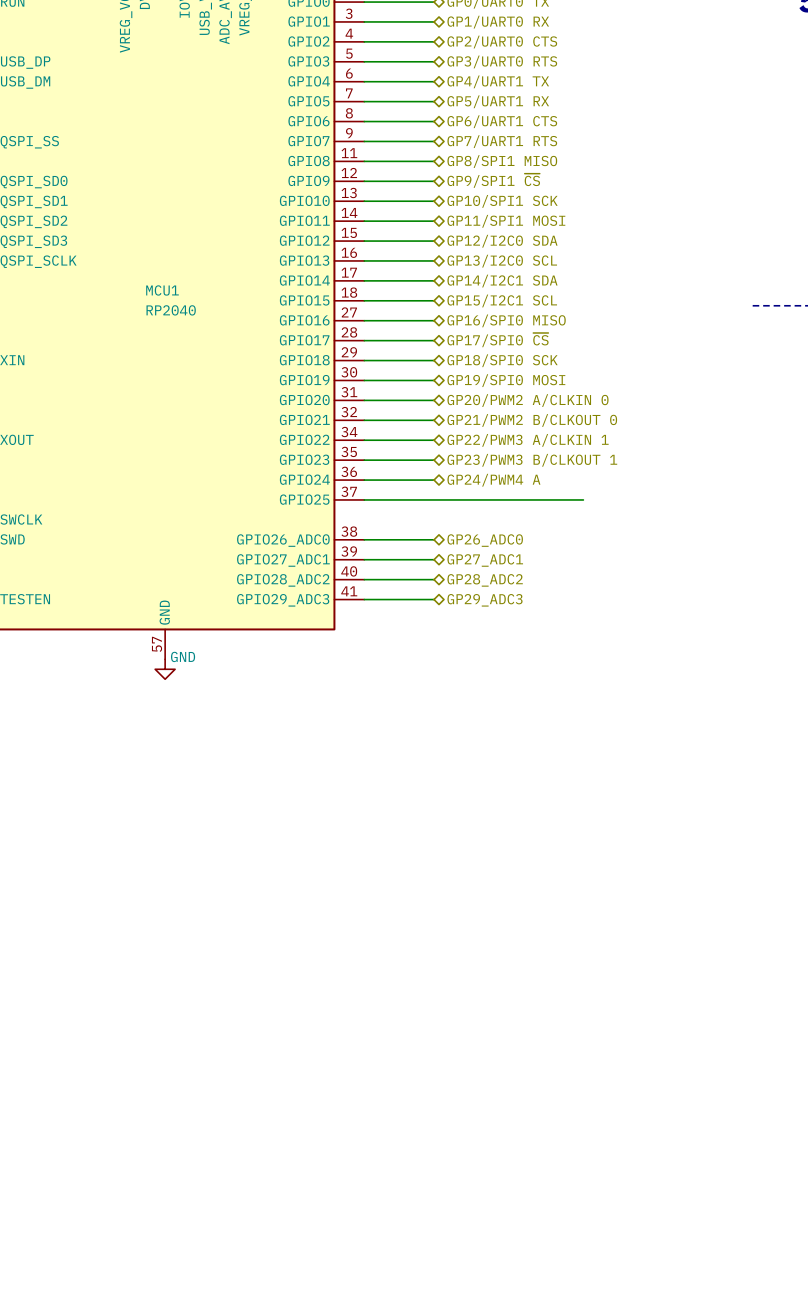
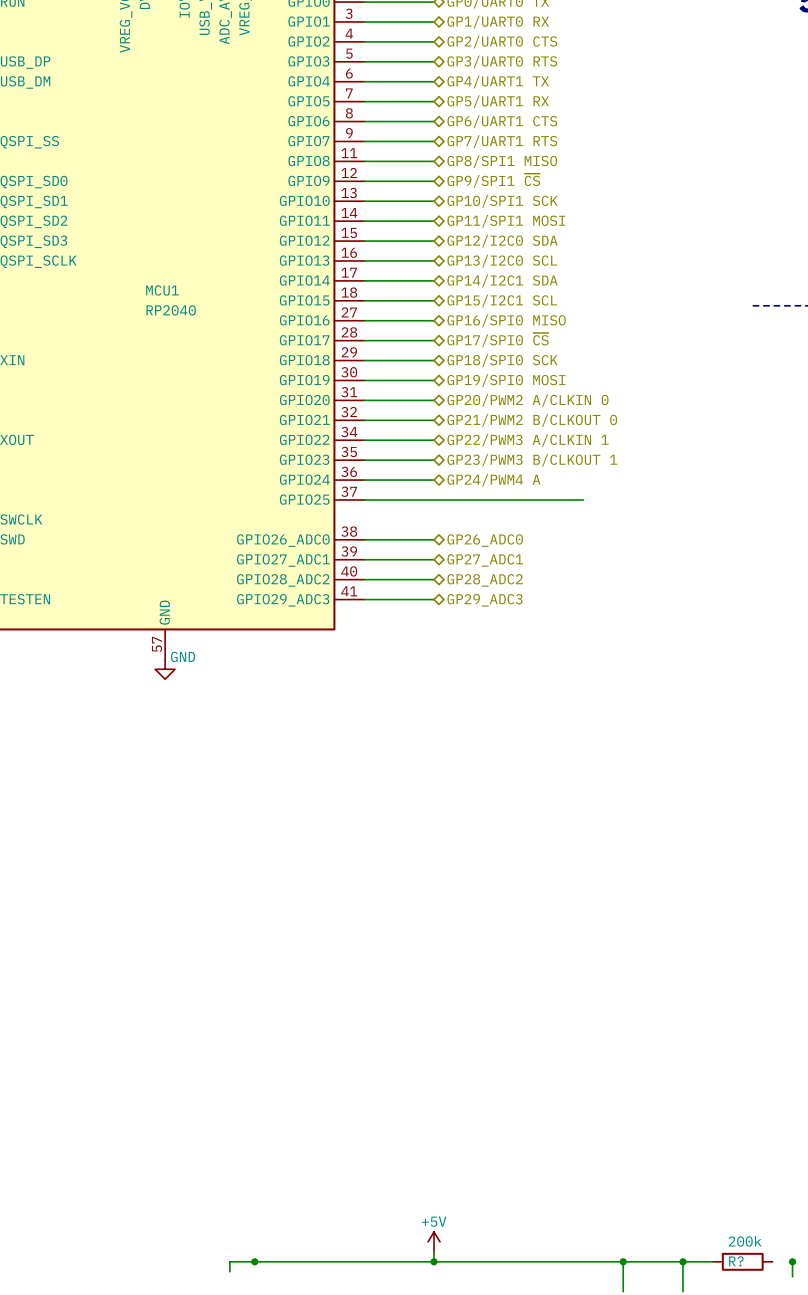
power symbol: none -> +5V (434, 1241)
wire: none -> (434, 1251) (434, 1261)
junction: none -> (254, 1261)
junction: none -> (434, 1261)
wire: none -> (623, 1261) (623, 1291)
junction: none -> (623, 1261)
wire: none -> (682, 1261) (682, 1291)
junction: none -> (682, 1261)
wire: none -> (712, 1261) (229, 1261) (229, 1271)
R?: none -> 200k (742, 1261)
wire: none -> (792, 1261) (792, 1276)
junction: none -> (792, 1261)

